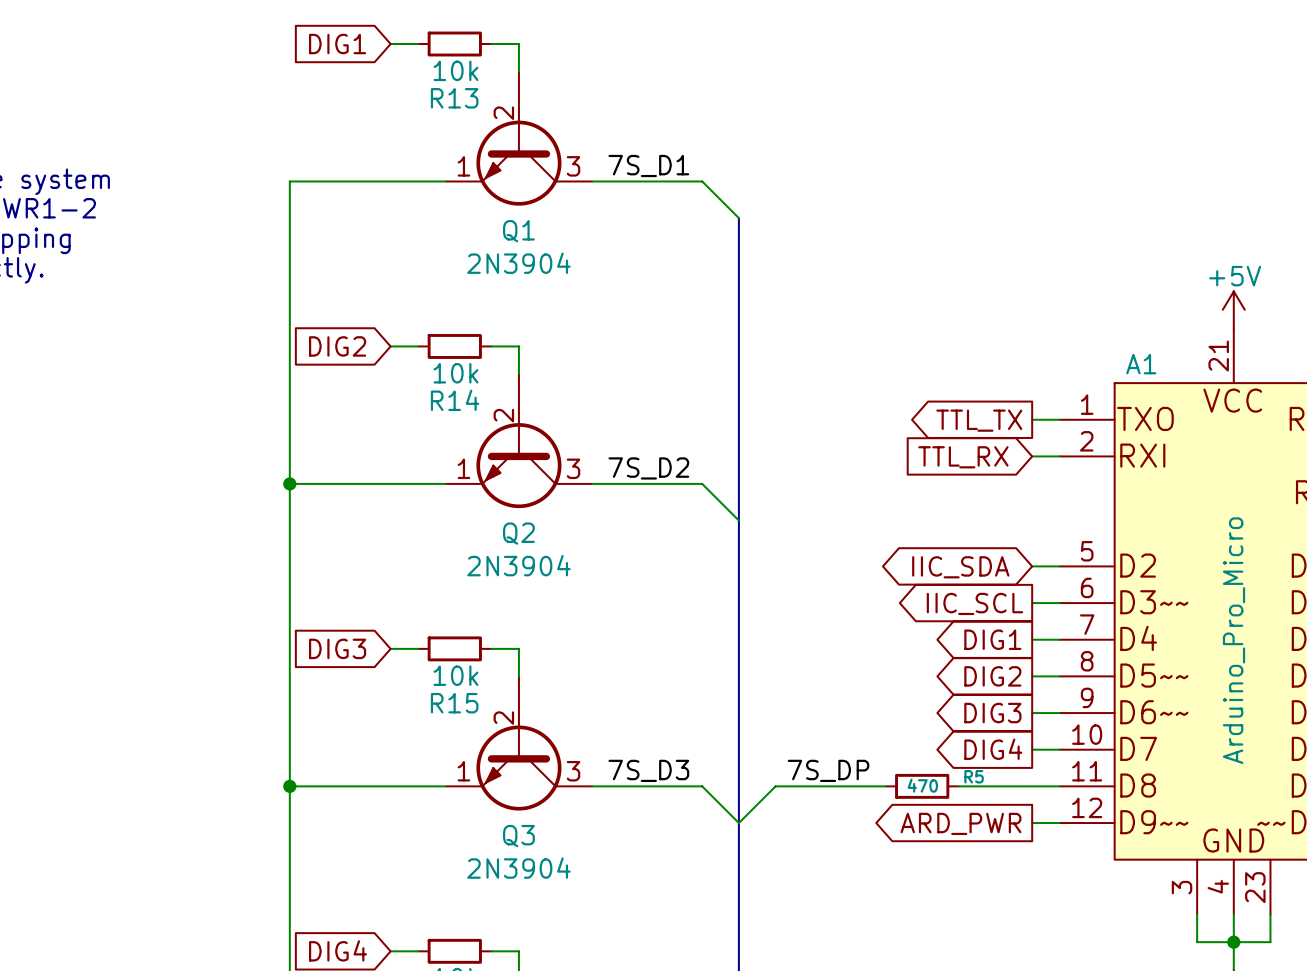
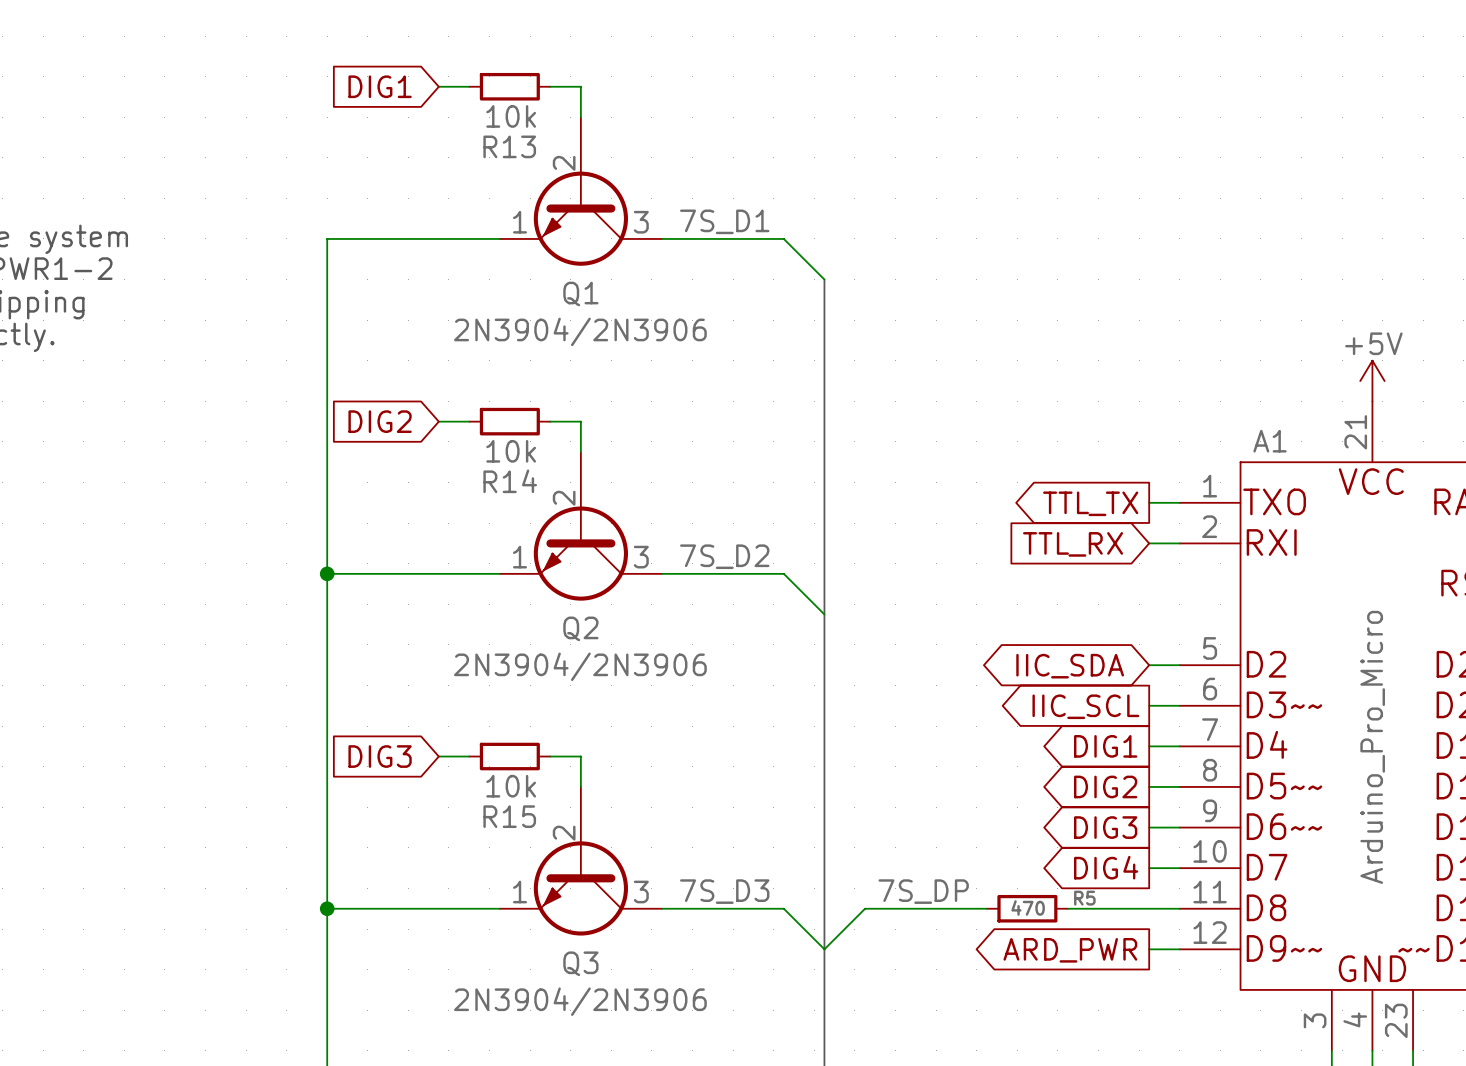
Q1 value: 2N3904 (518, 263) -> 2N3904/2N3906 (580, 331)
Q2 value: 2N3904 (518, 565) -> 2N3904/2N3906 (580, 666)
Q3 value: 2N3904 (518, 868) -> 2N3904/2N3906 (580, 1001)

